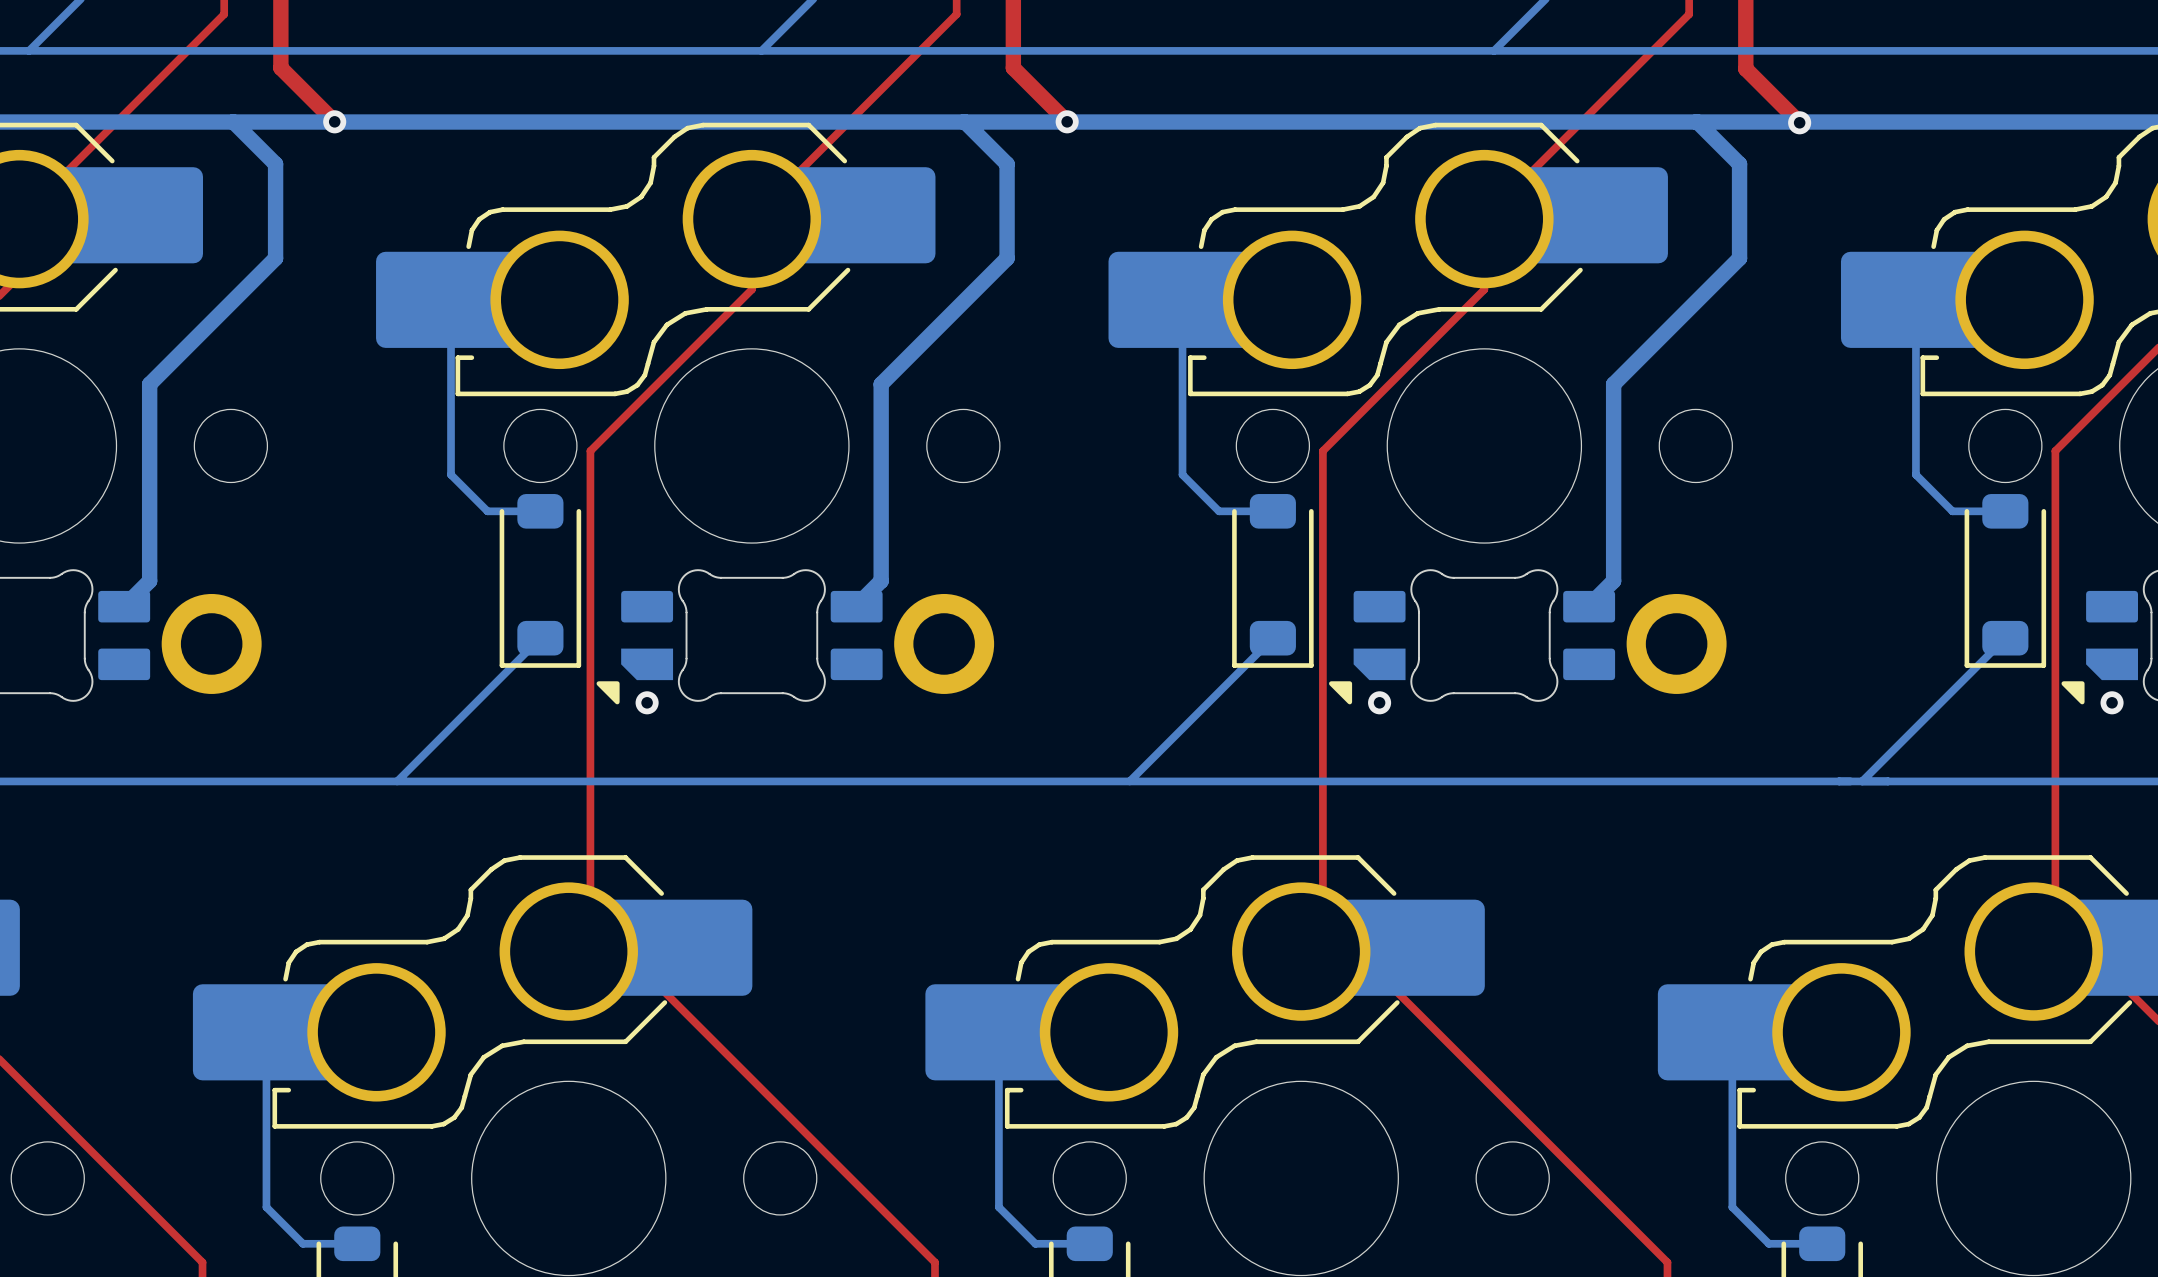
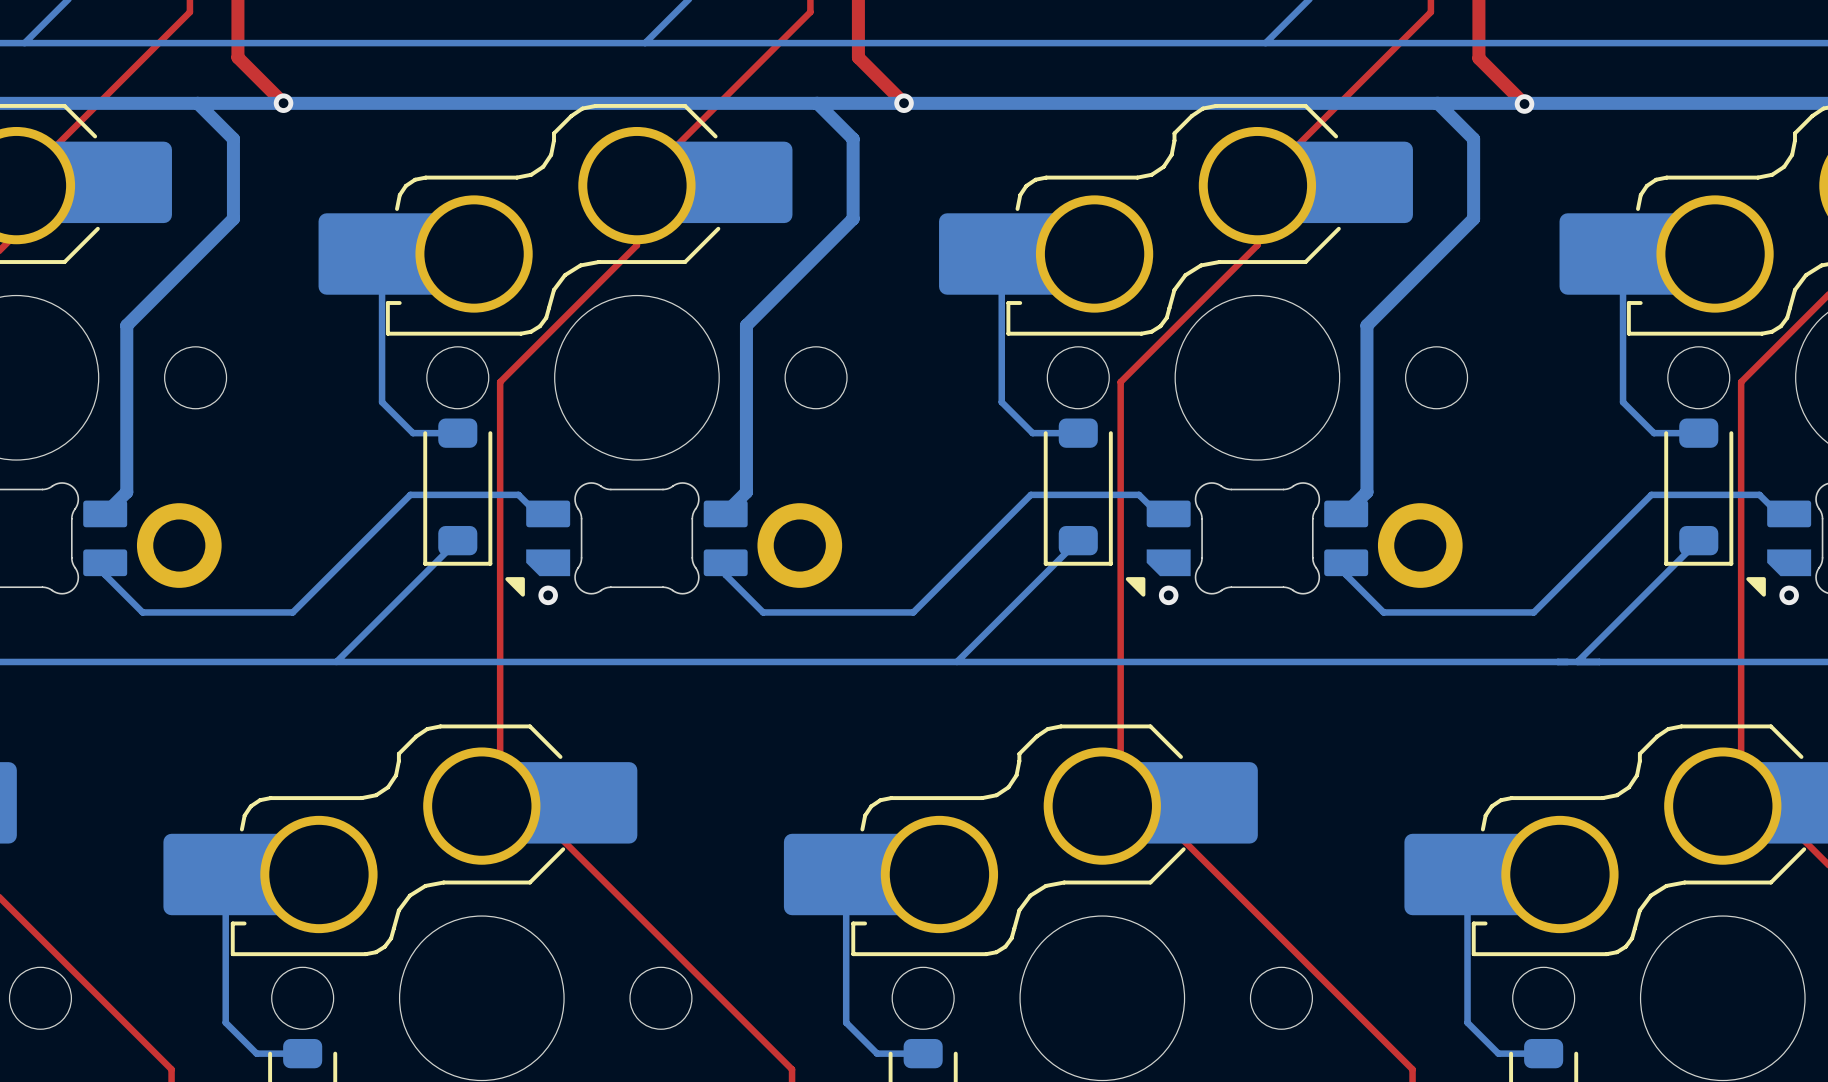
bottom track: none -> (537, 513) (518, 494) (410, 494) (292, 612) (142, 612) (105, 575) (105, 562)
bottom track: none -> (1158, 513) (1139, 494) (1030, 494) (913, 612) (763, 612) (725, 575) (725, 562)
bottom track: none -> (1778, 513) (1759, 494) (1651, 494) (1533, 612) (1383, 612) (1346, 575) (1346, 562)

